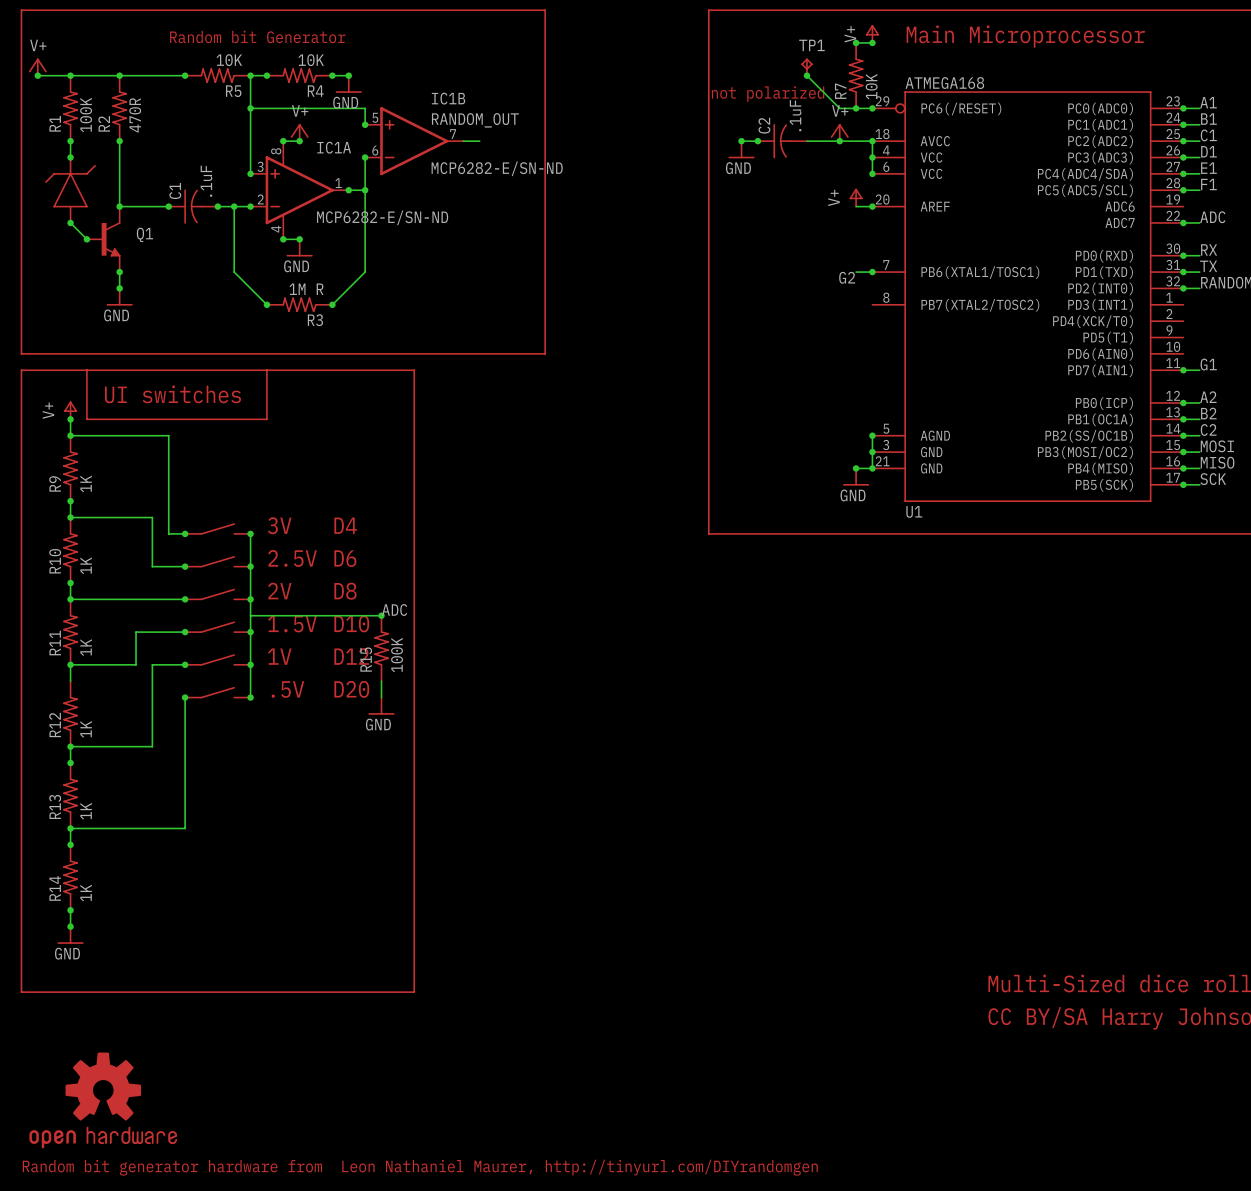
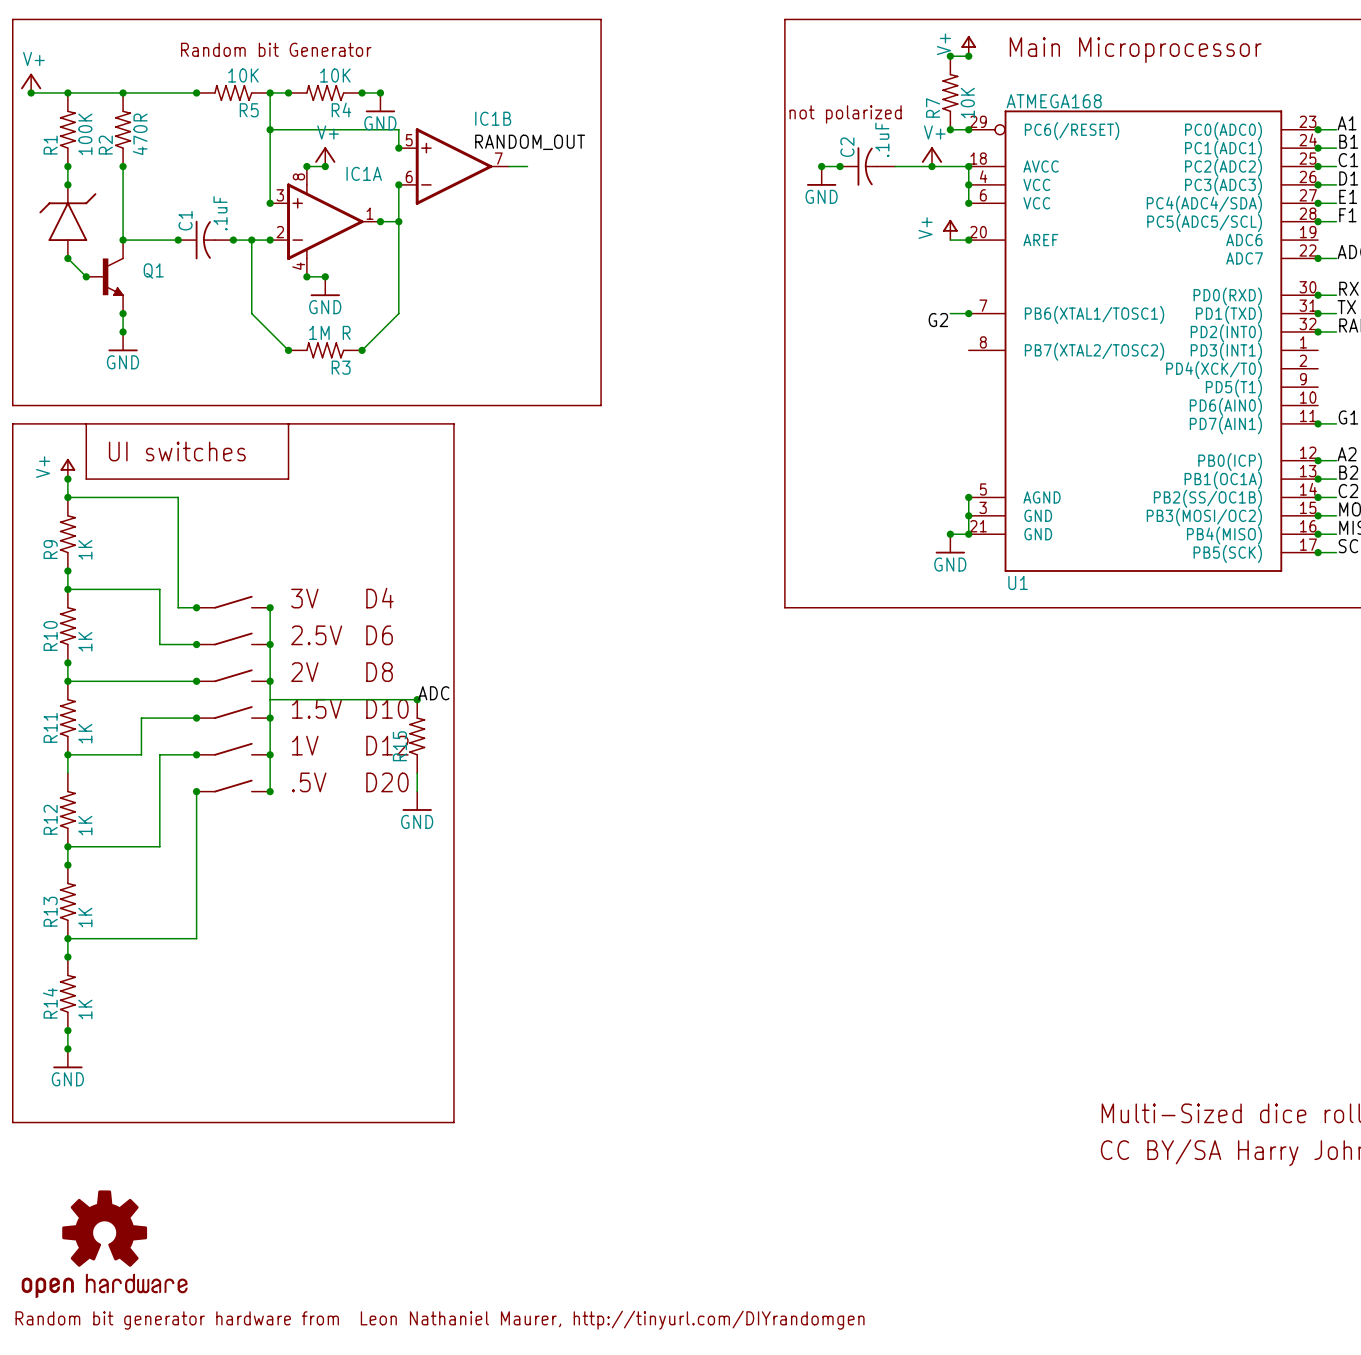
TP1: (806, 67) -> none
wire: (806, 75) (839, 108) (856, 108) -> none
junction: (806, 75) -> none
IC1B value: MCP6282-E/SN-ND (497, 168) -> none
IC1A value: MCP6282-E/SN-ND (382, 217) -> none
R15 value: 100K (397, 655) -> none

